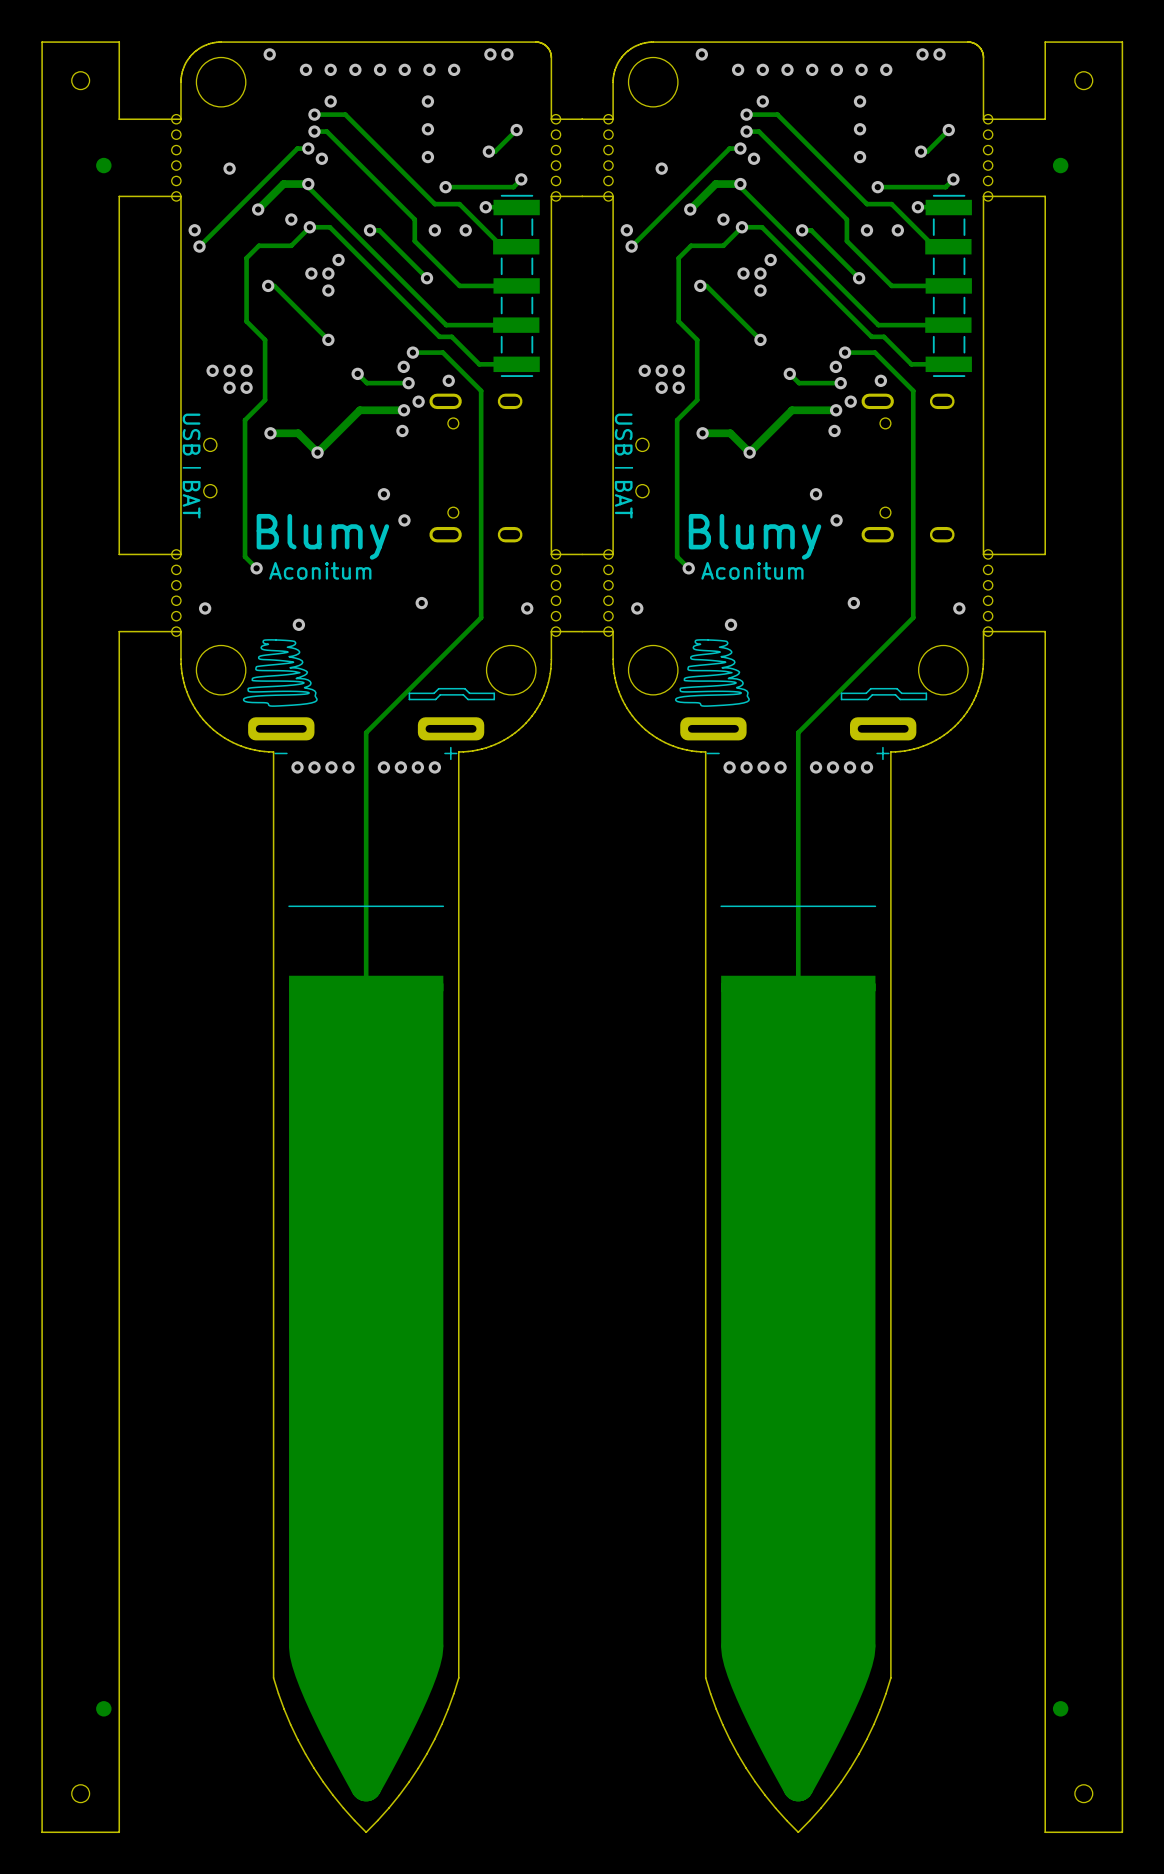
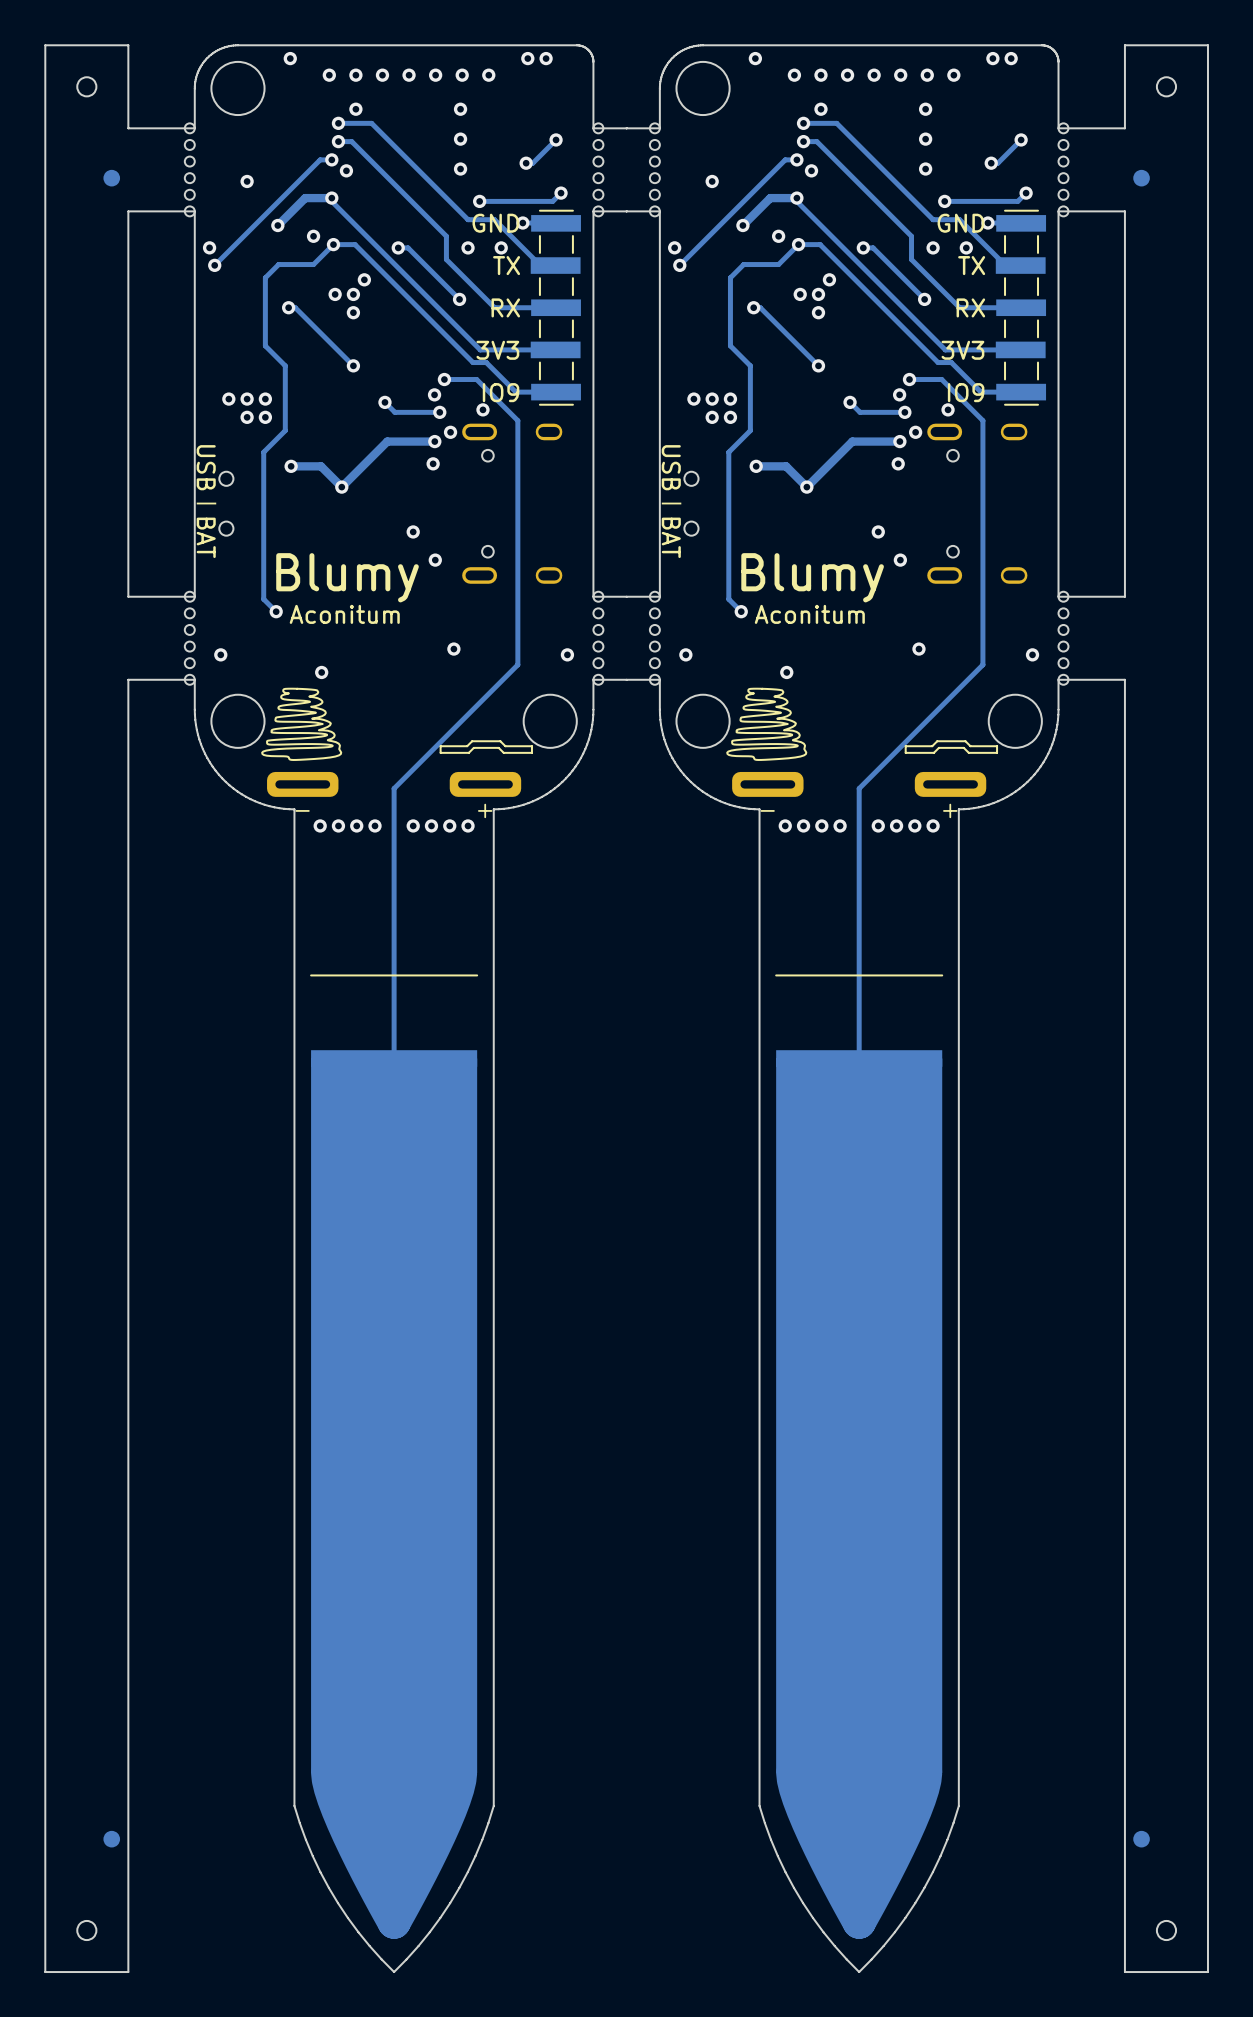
text: none -> GND (495, 223)
text: none -> GND (960, 223)
text: none -> TX (506, 265)
text: none -> TX (971, 265)
text: none -> RX (505, 307)
text: none -> RX (970, 307)
text: none -> 3V3 (497, 350)
text: none -> 3V3 (962, 350)
text: none -> IO9 (501, 392)
text: none -> IO9 (966, 392)

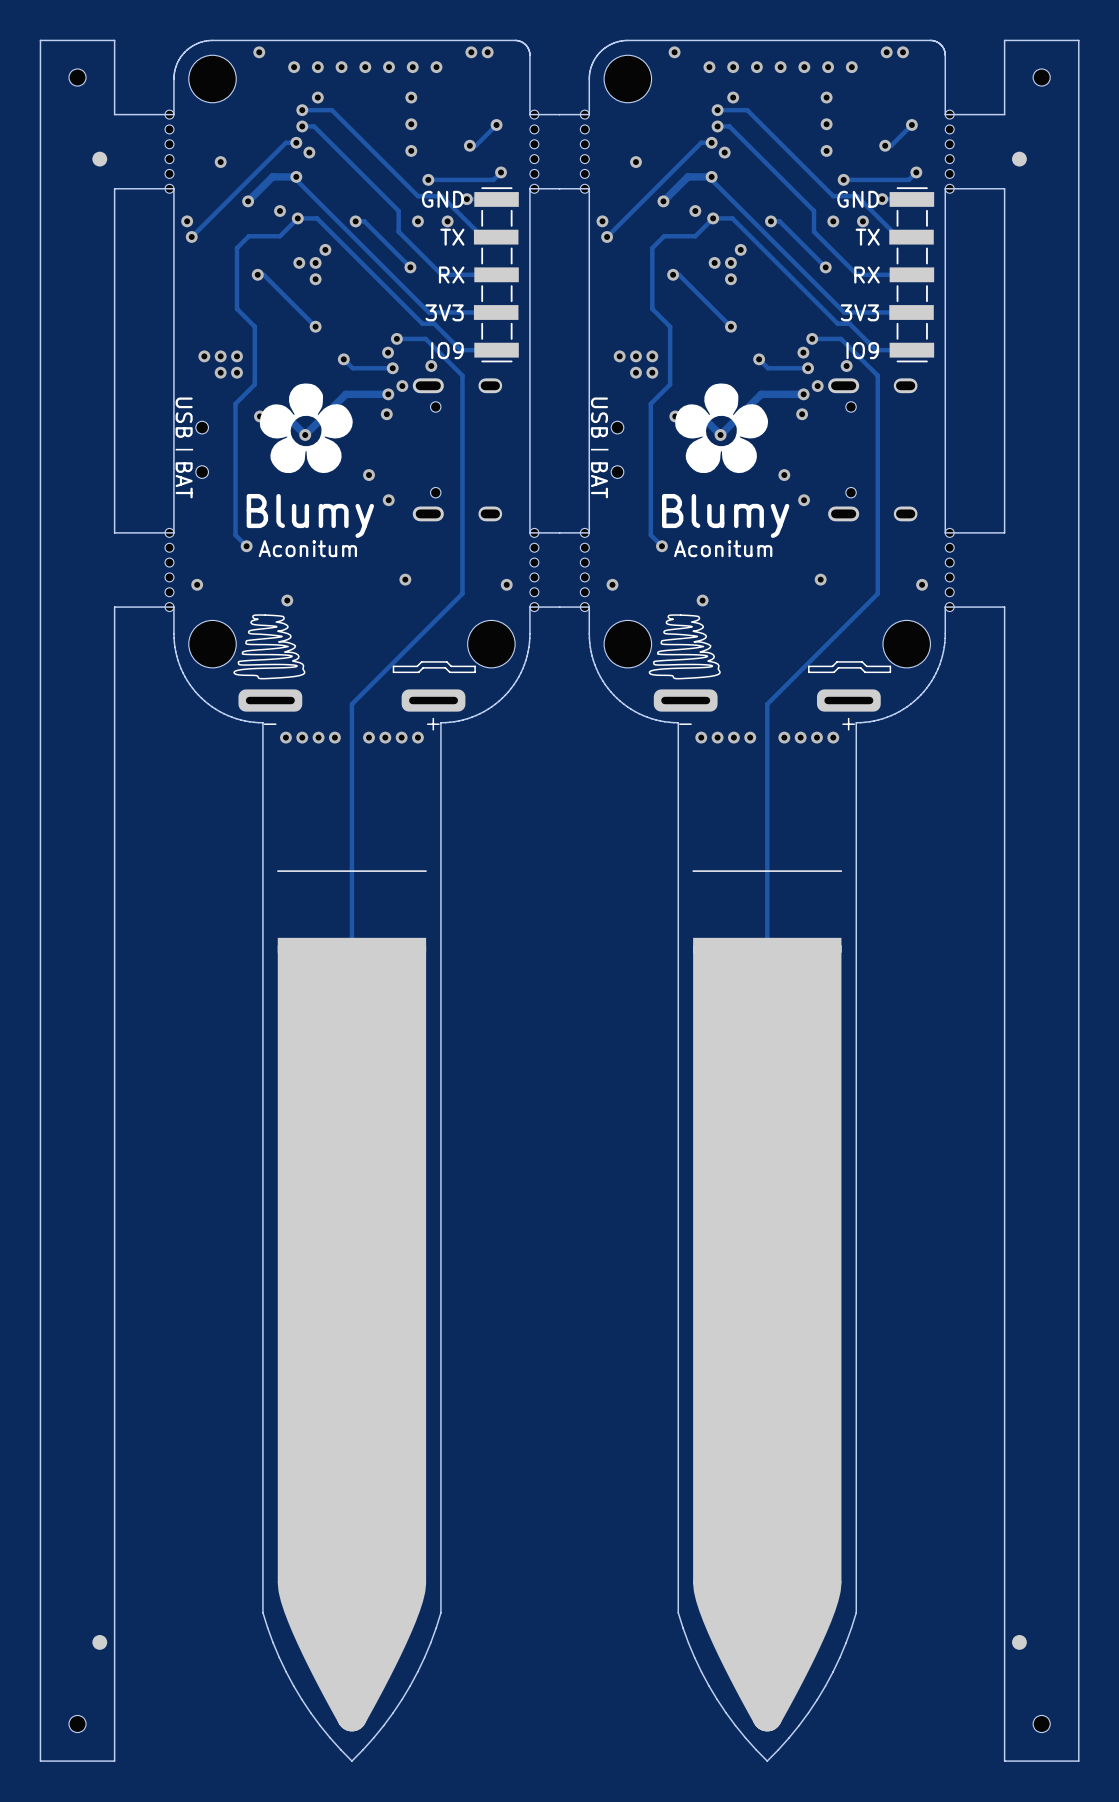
drawing: none -> [259, 383, 353, 474]
drawing: none -> [675, 383, 769, 474]

